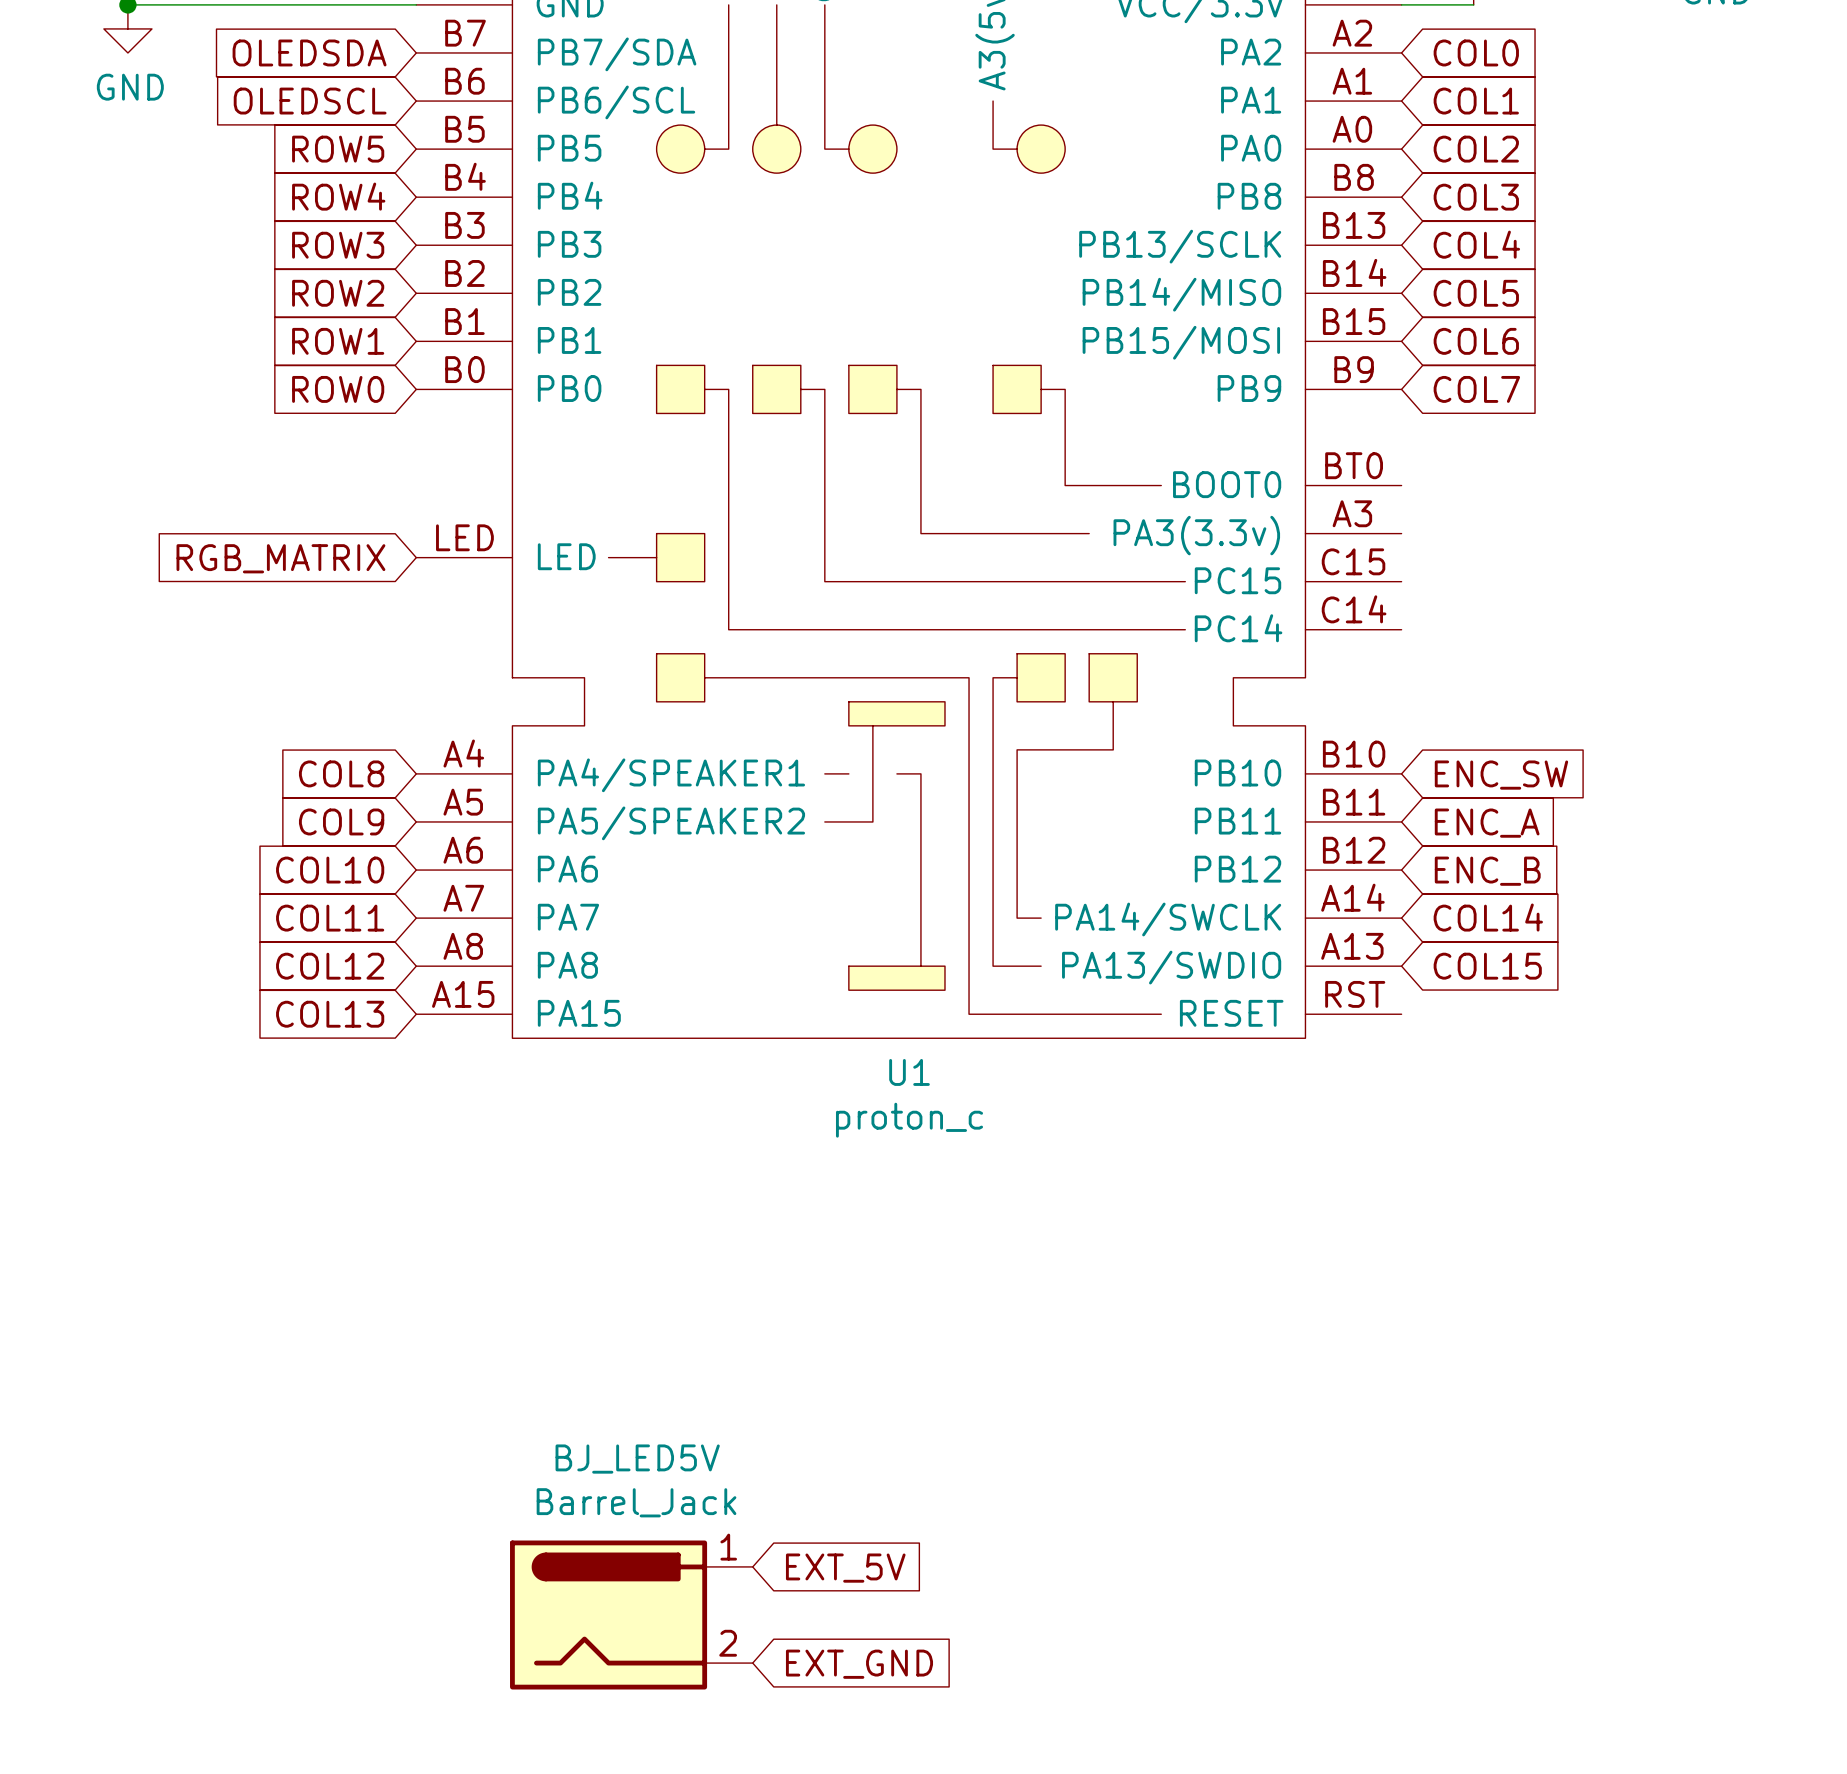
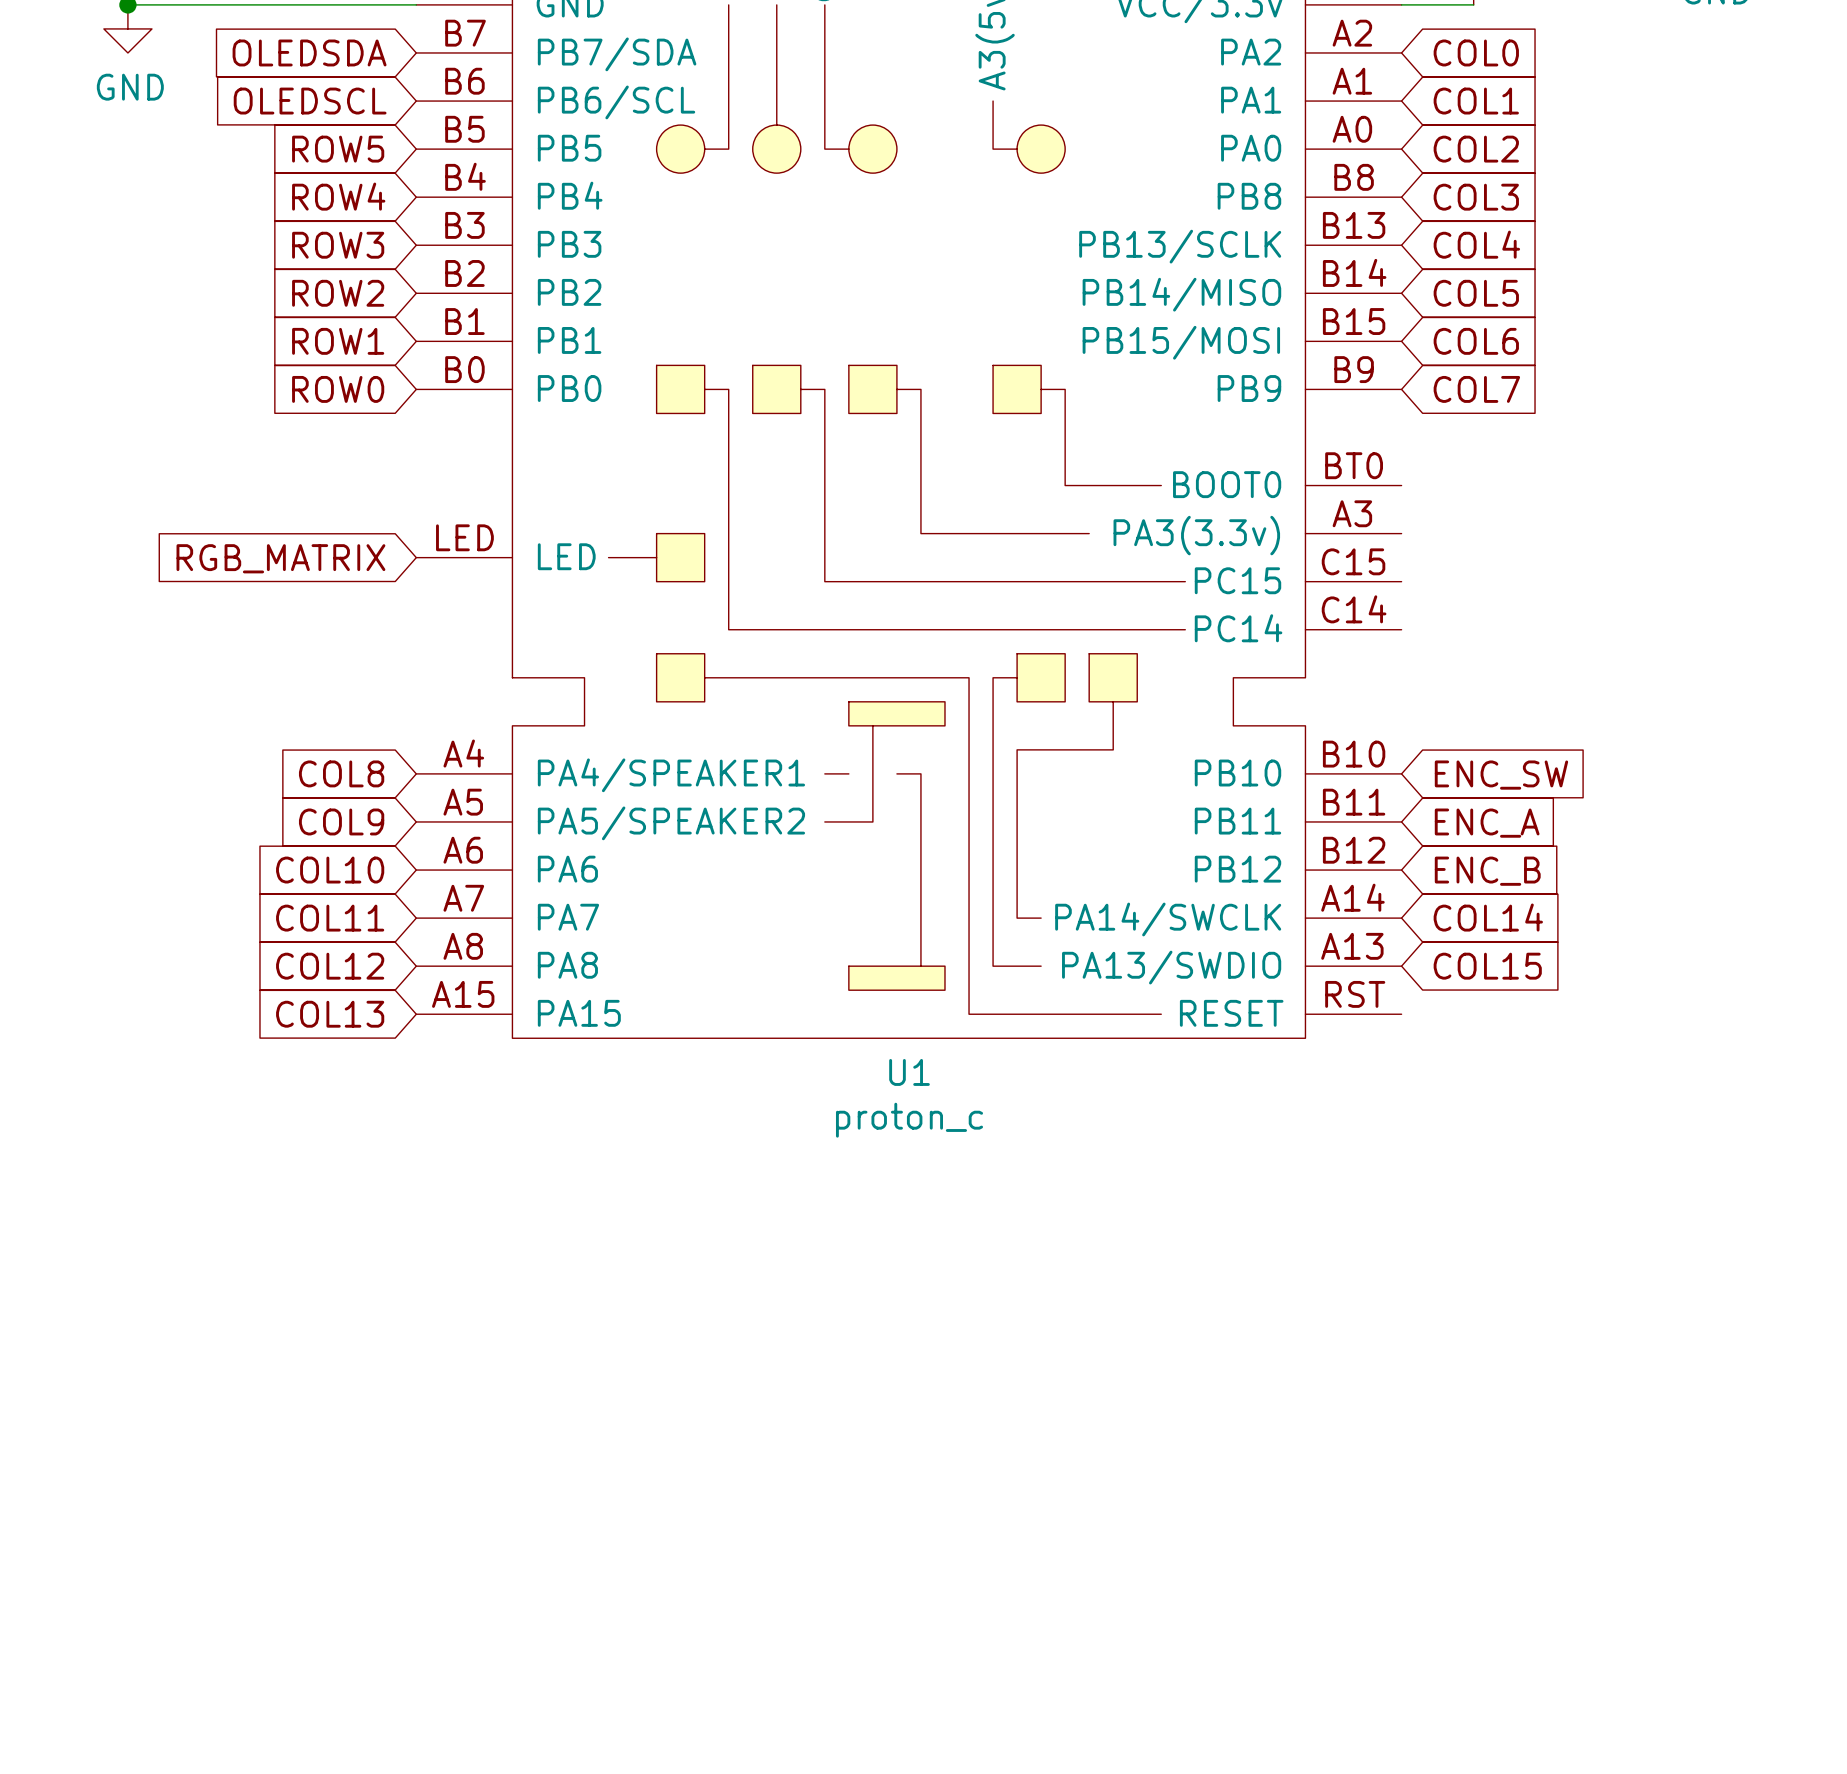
global label: EXT_5V (845, 1568) -> none
BJ_LED5V: Barrel_Jack (631, 1615) -> none
global label: EXT_GND (859, 1664) -> none

